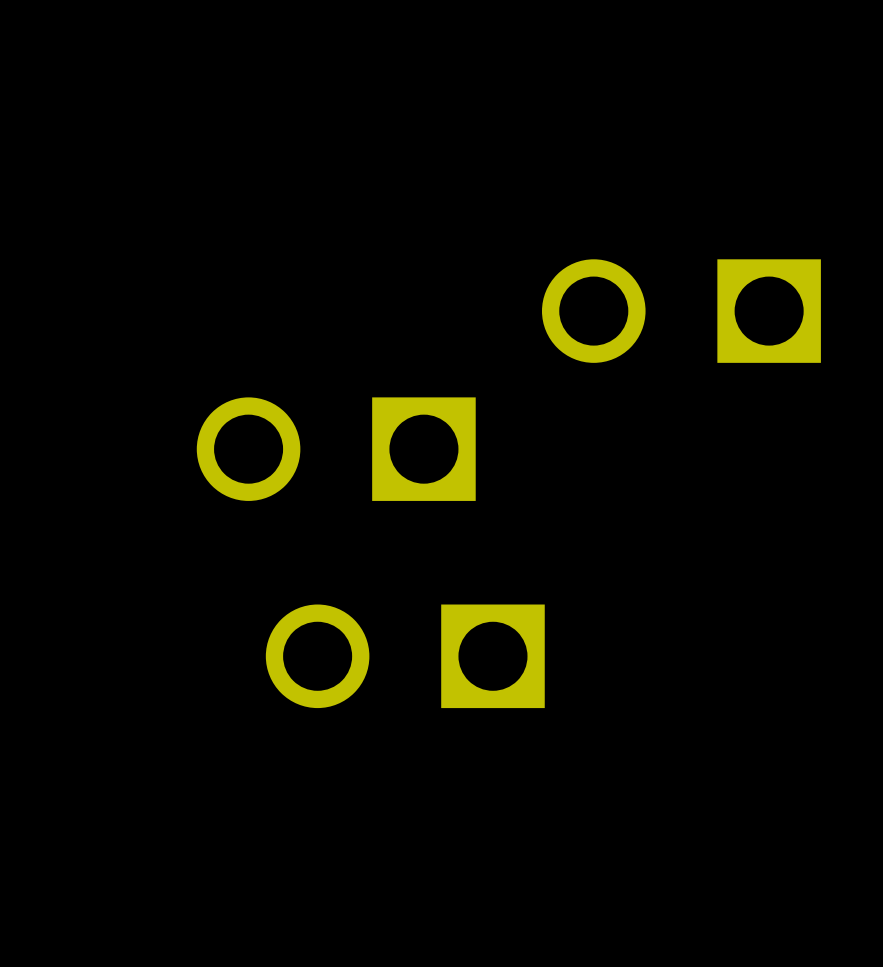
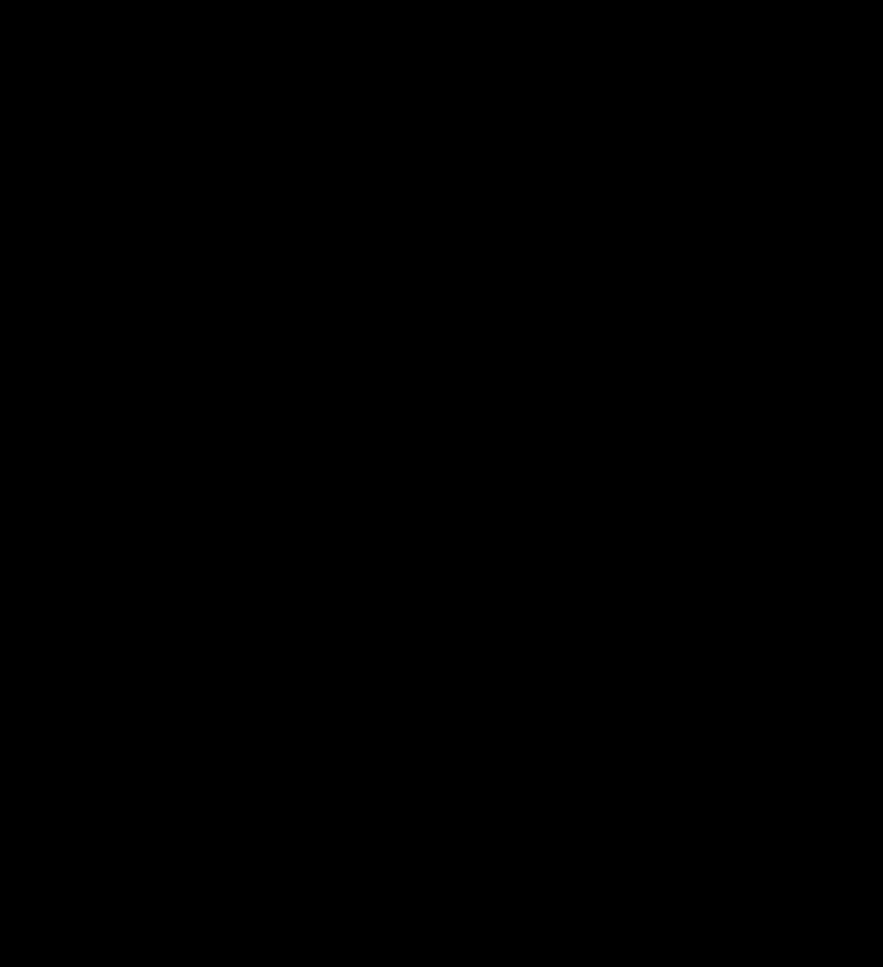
part: (681, 311) -> none
part: (336, 449) -> none
part: (405, 656) -> none

